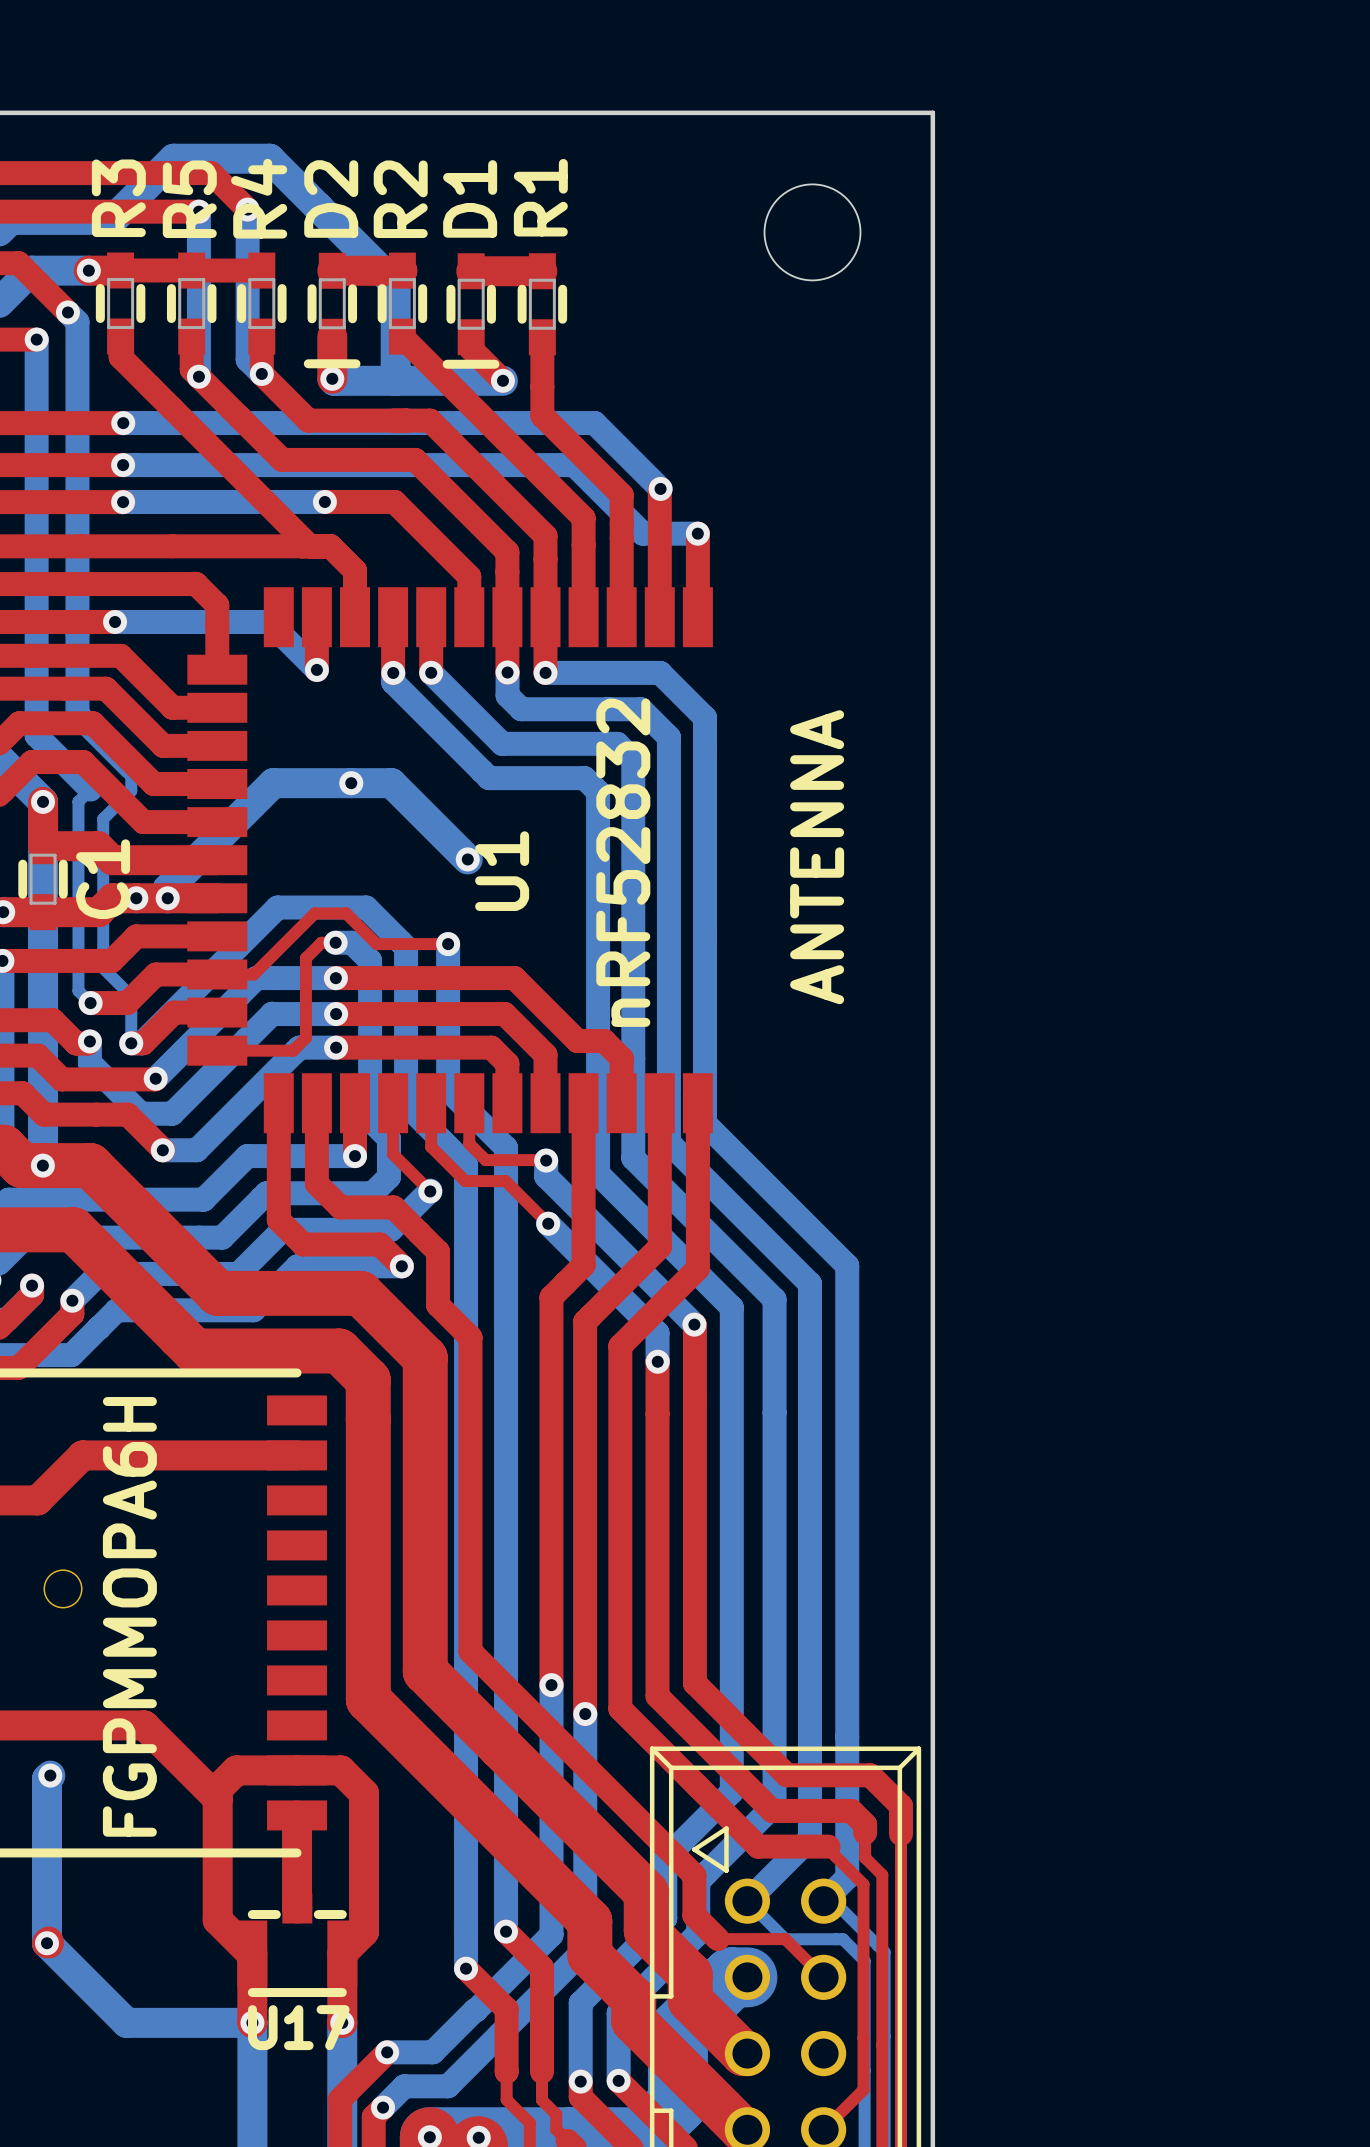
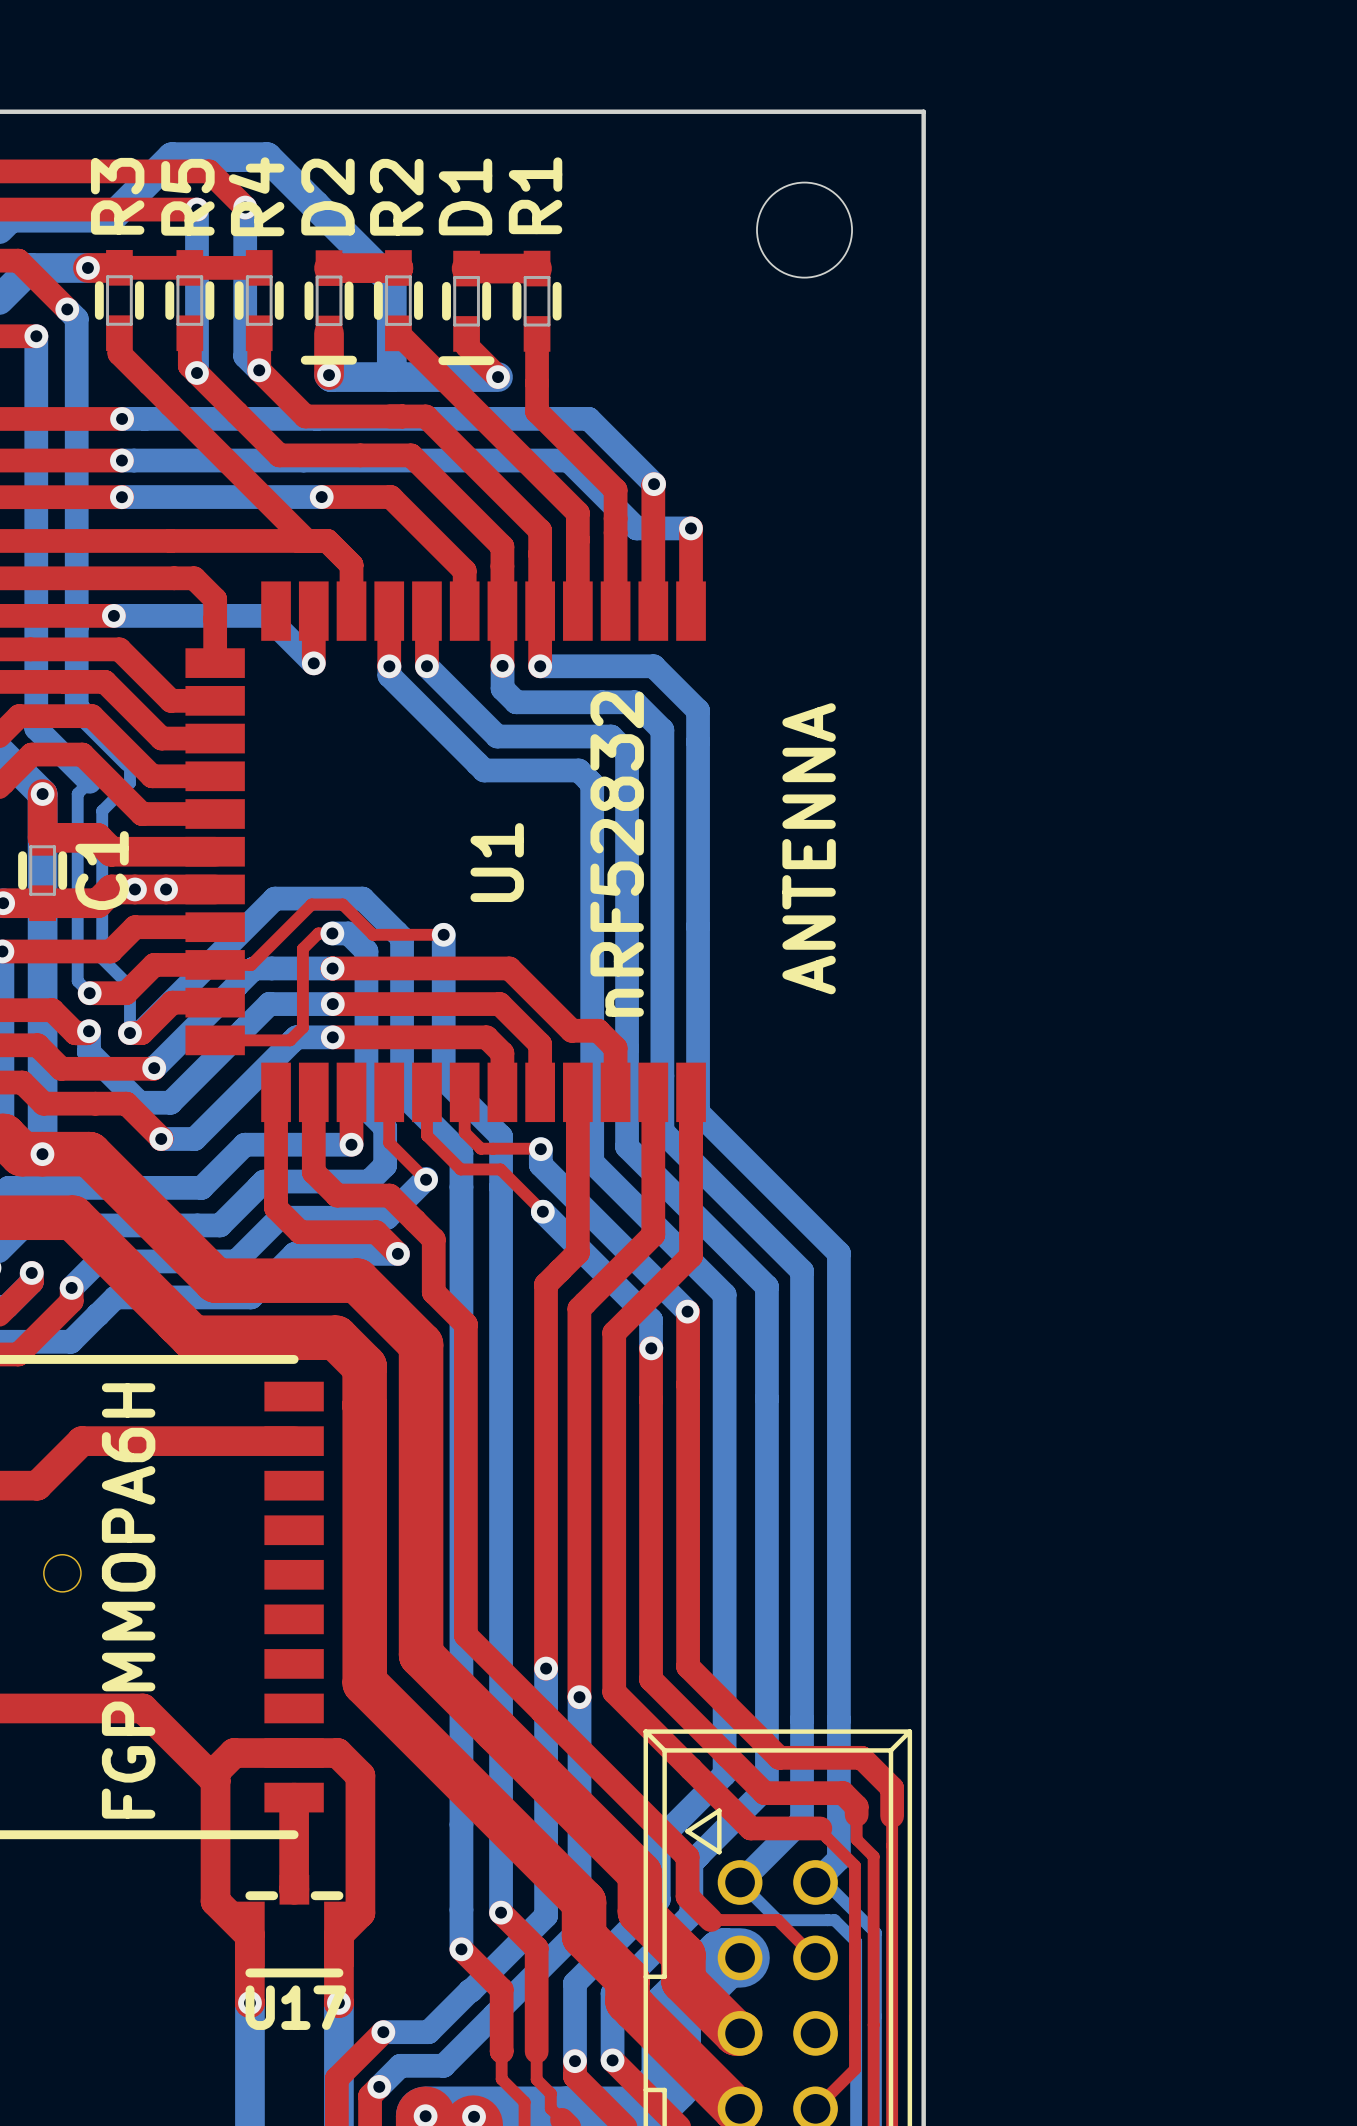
via: (351, 783) -> none
bottom track: (467, 859) (391, 783) (273, 783) (167, 888) (167, 898) -> none
via: (467, 859) -> none
bottom track: (50, 1775) (47, 1778) (47, 1943) (126, 2022) (252, 2022) -> none
via: (50, 1775) -> none
top track: (48, 1941) (47, 1943) -> none
via: (47, 1943) -> none

